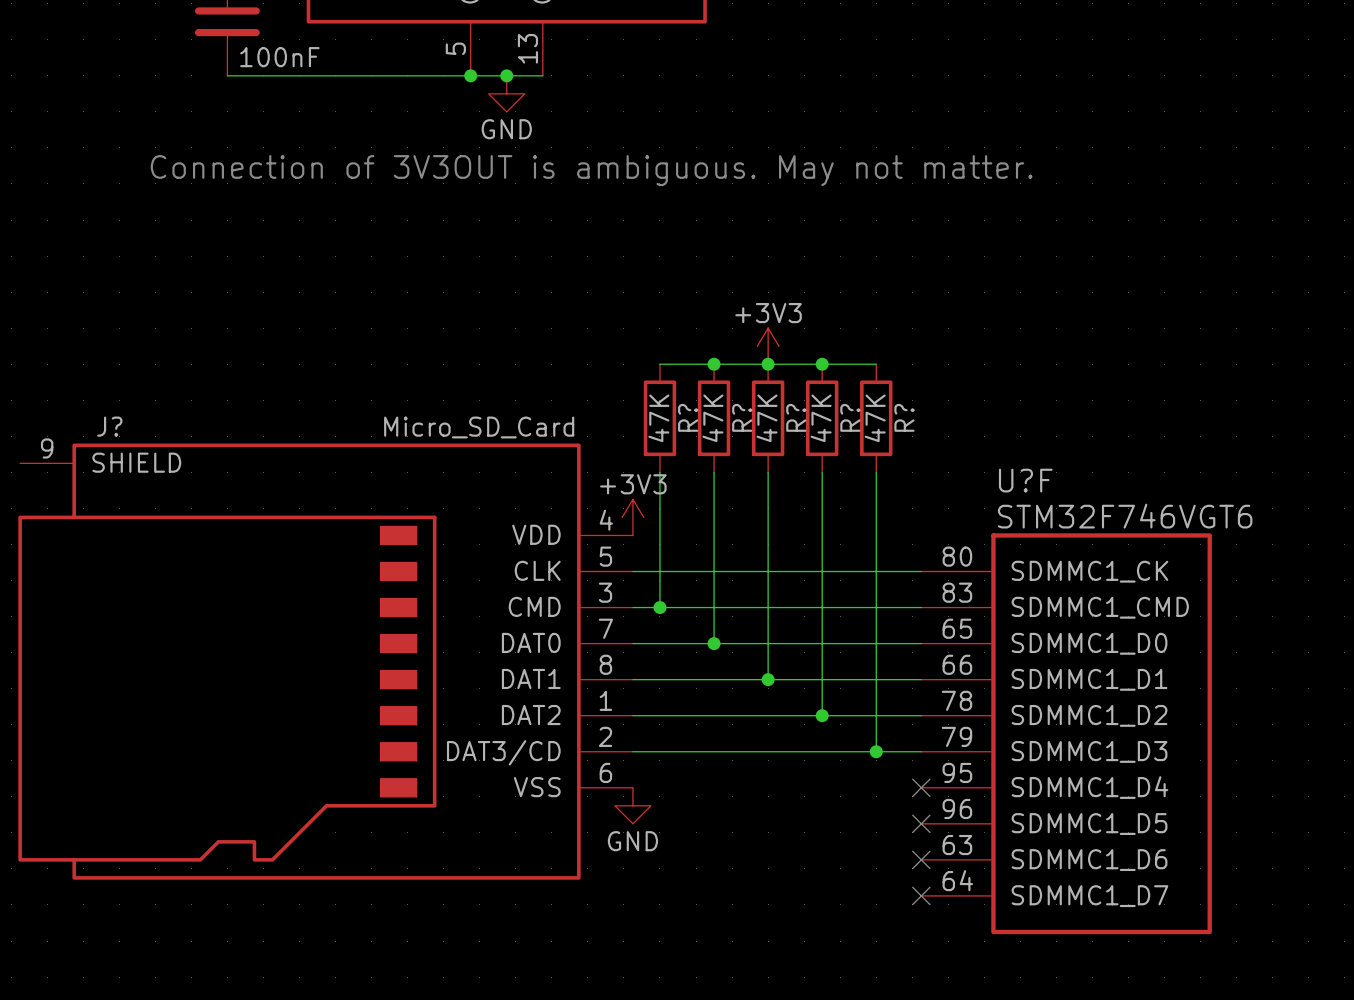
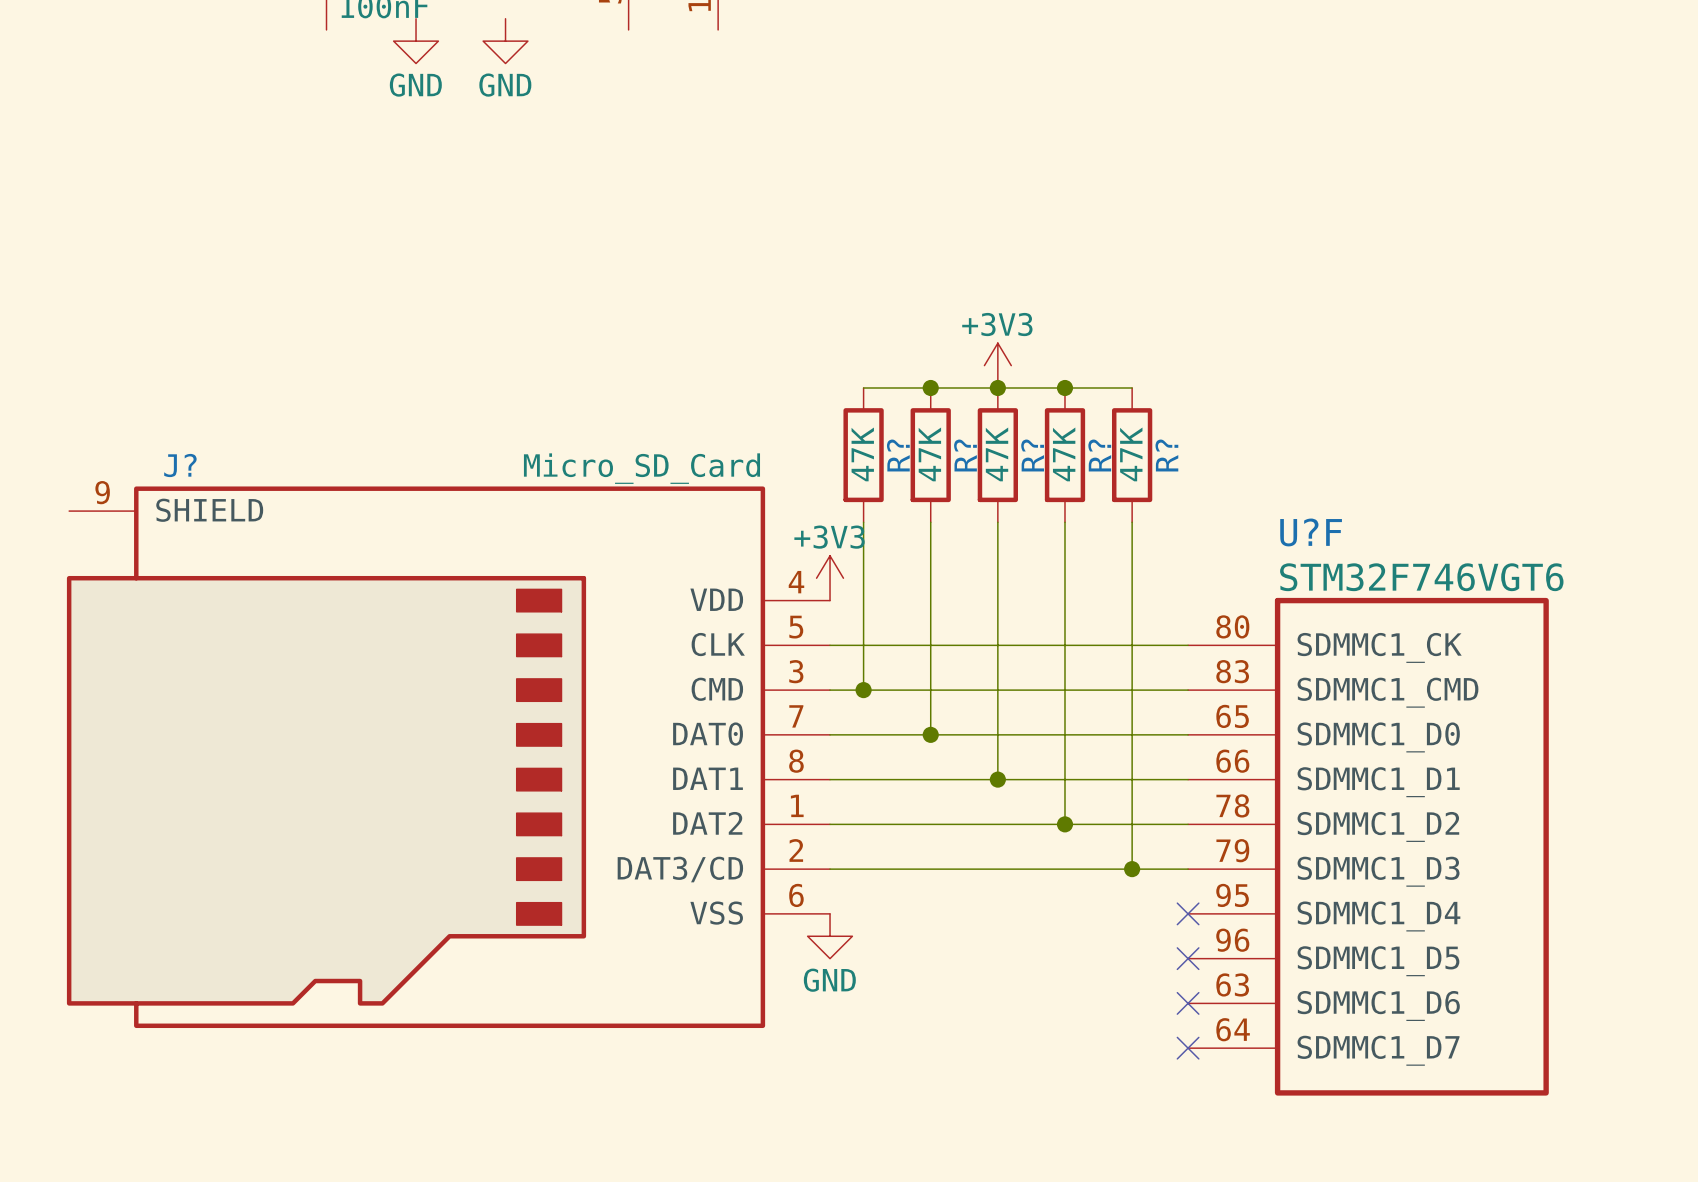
wire: (227, 75) (542, 75) -> none
junction: (470, 75) -> none
junction: (506, 75) -> none
power symbol: none -> GND (416, 41)
power symbol: none -> GND (505, 41)
power symbol: GND (506, 93) -> none
text: Connection of 3V3OUT is ambiguous. May not matter. (591, 170) -> none

